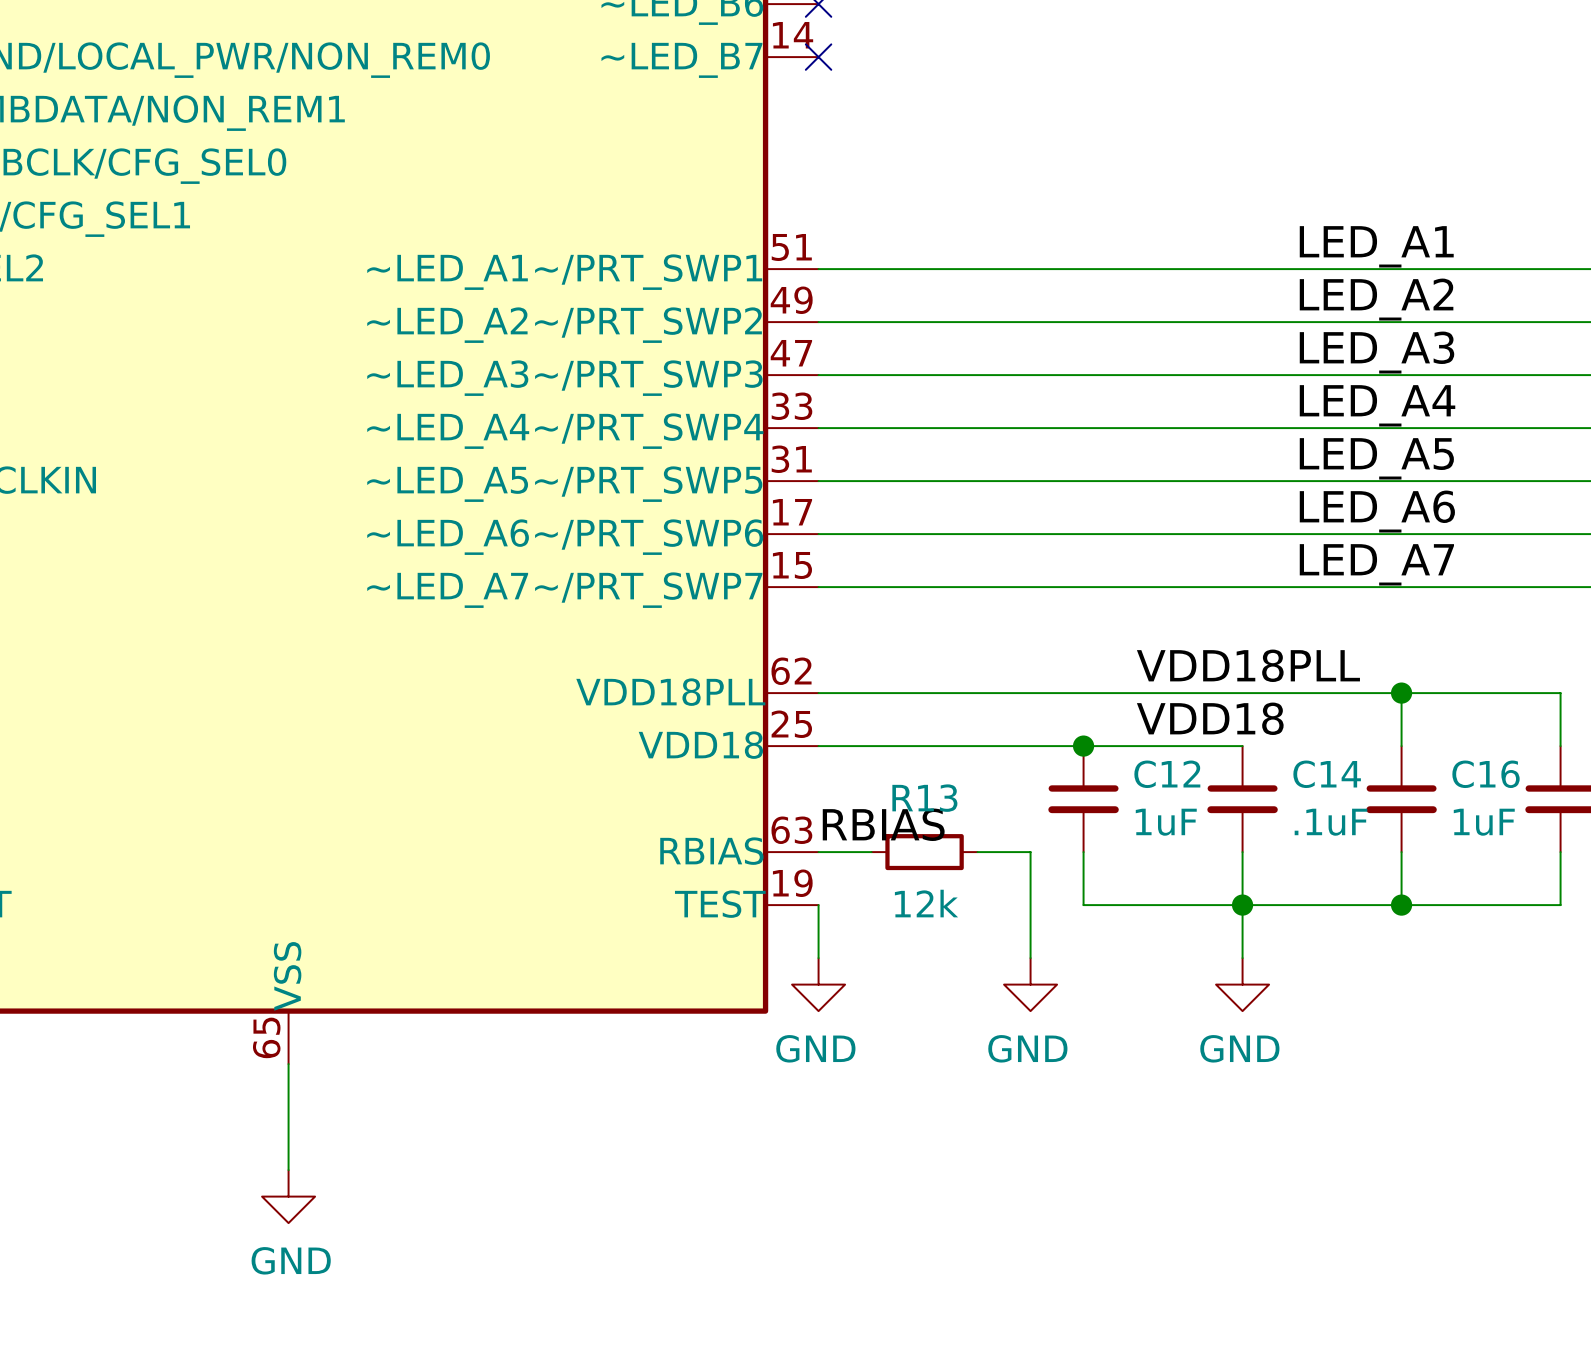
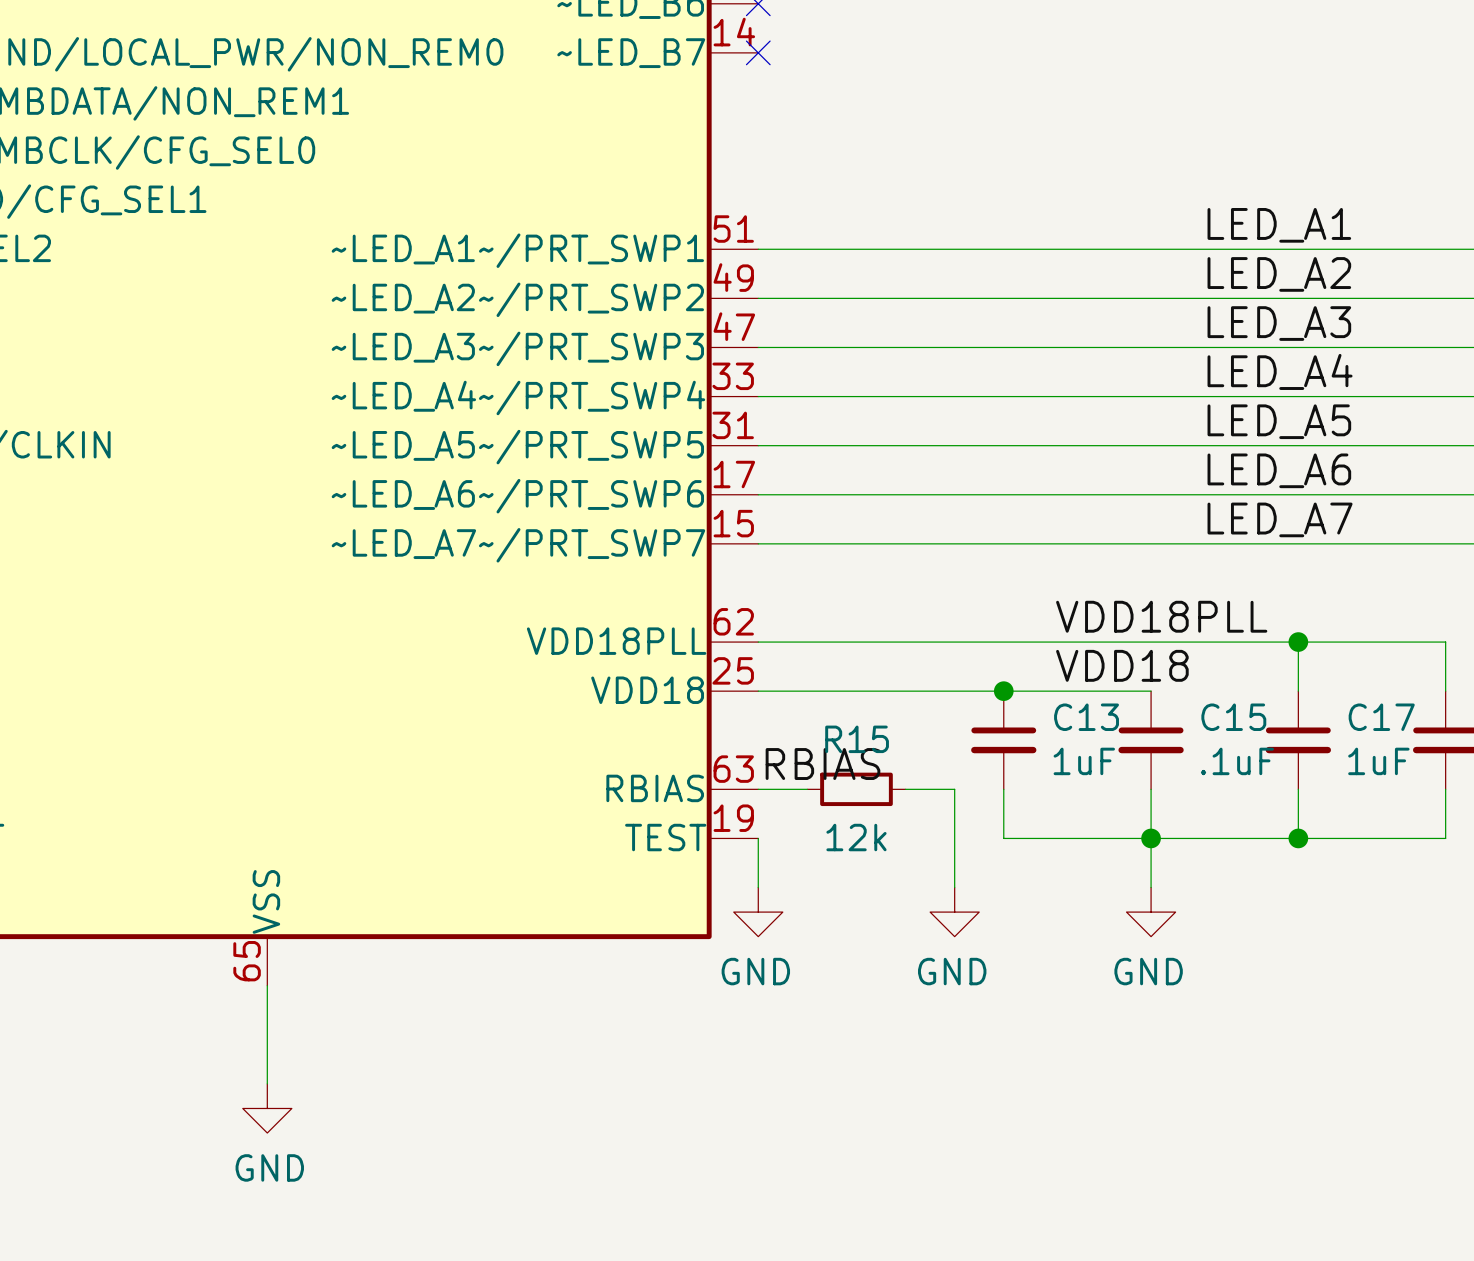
C12 name: C12 (1167, 774) -> C13 (1086, 717)
C14 name: C14 (1327, 774) -> C15 (1233, 717)
C16 name: C16 (1486, 774) -> C17 (1381, 717)
R13 name: R13 (924, 798) -> R15 (857, 739)

